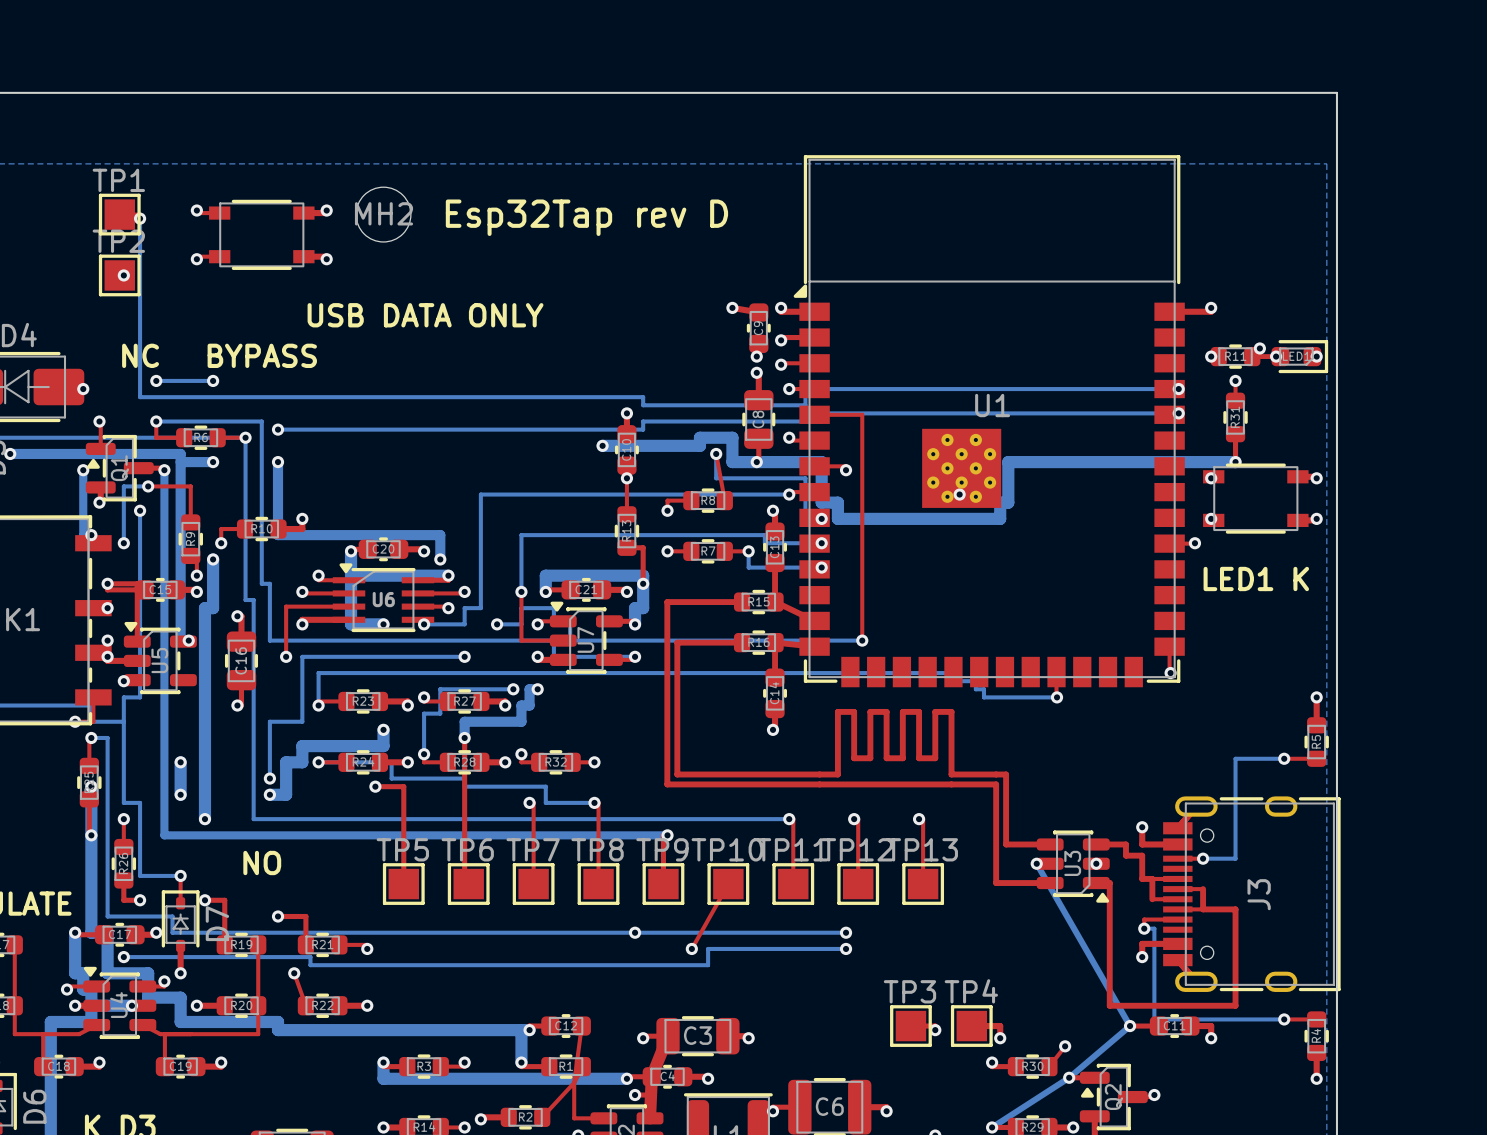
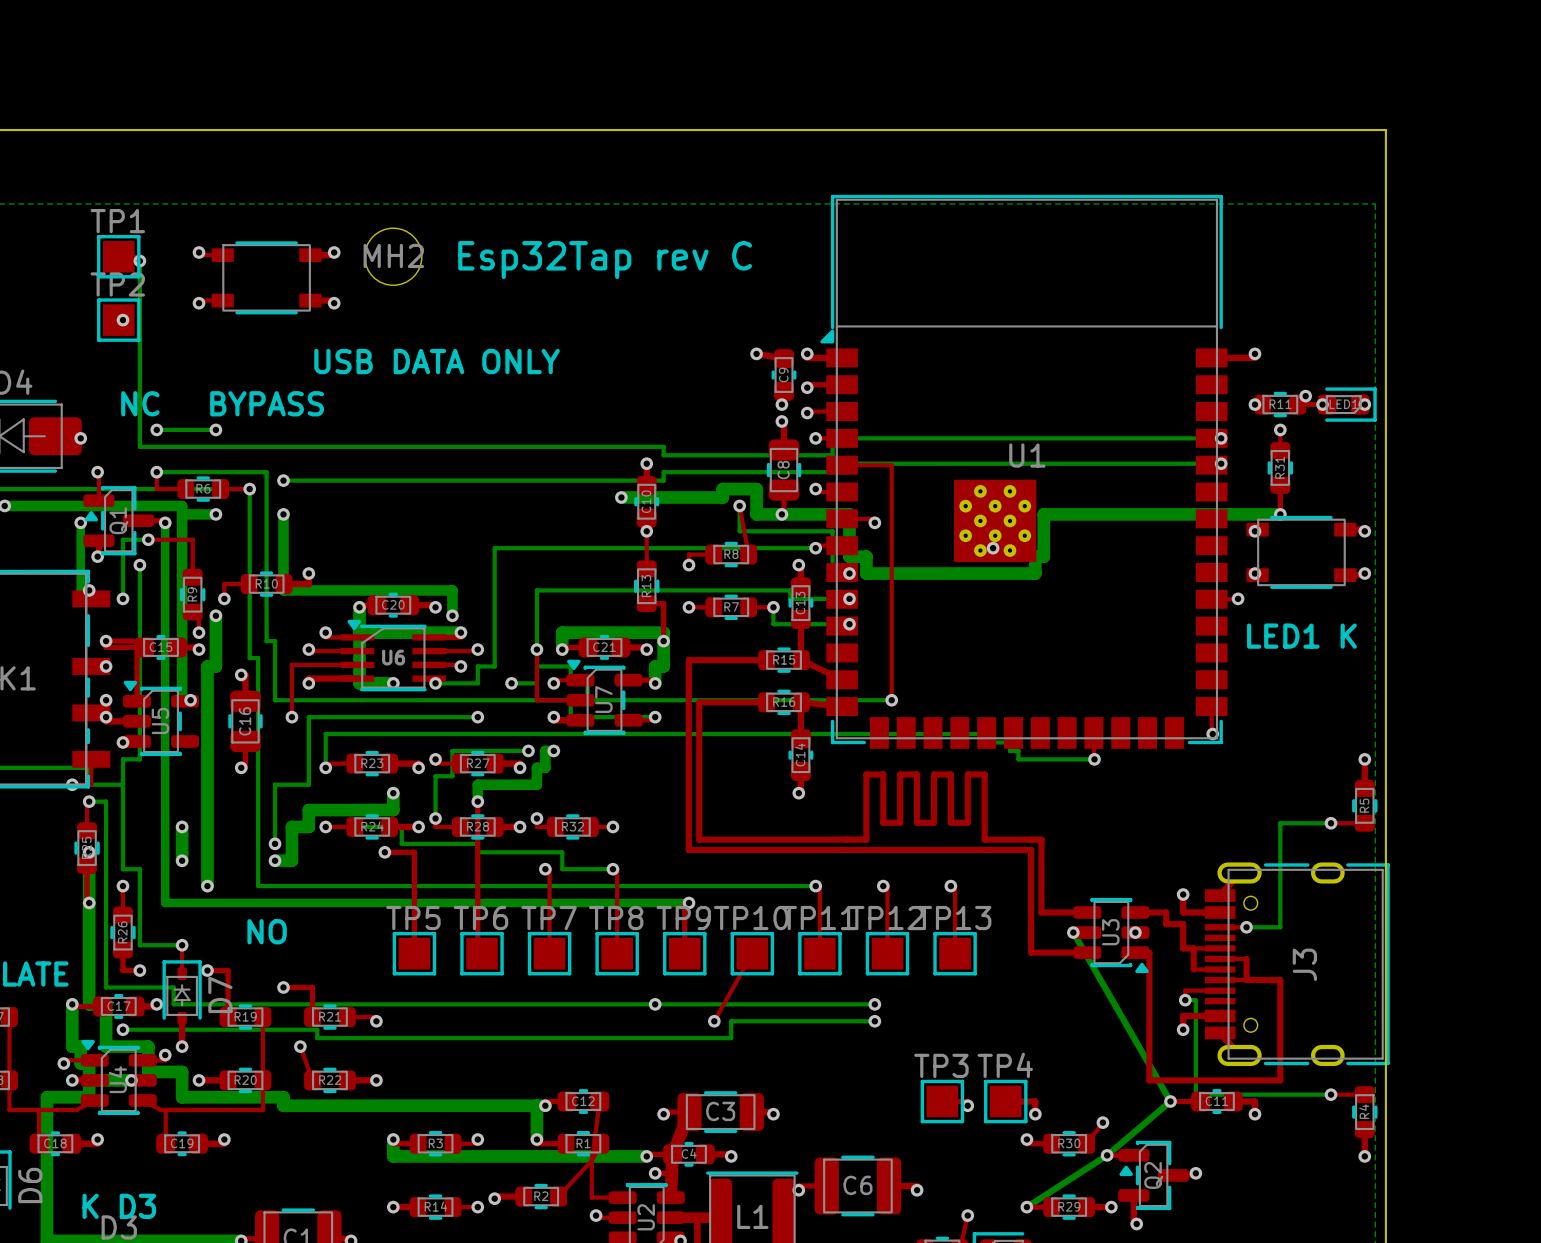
text: Esp32Tap rev D (586, 217) -> Esp32Tap rev C (605, 260)

